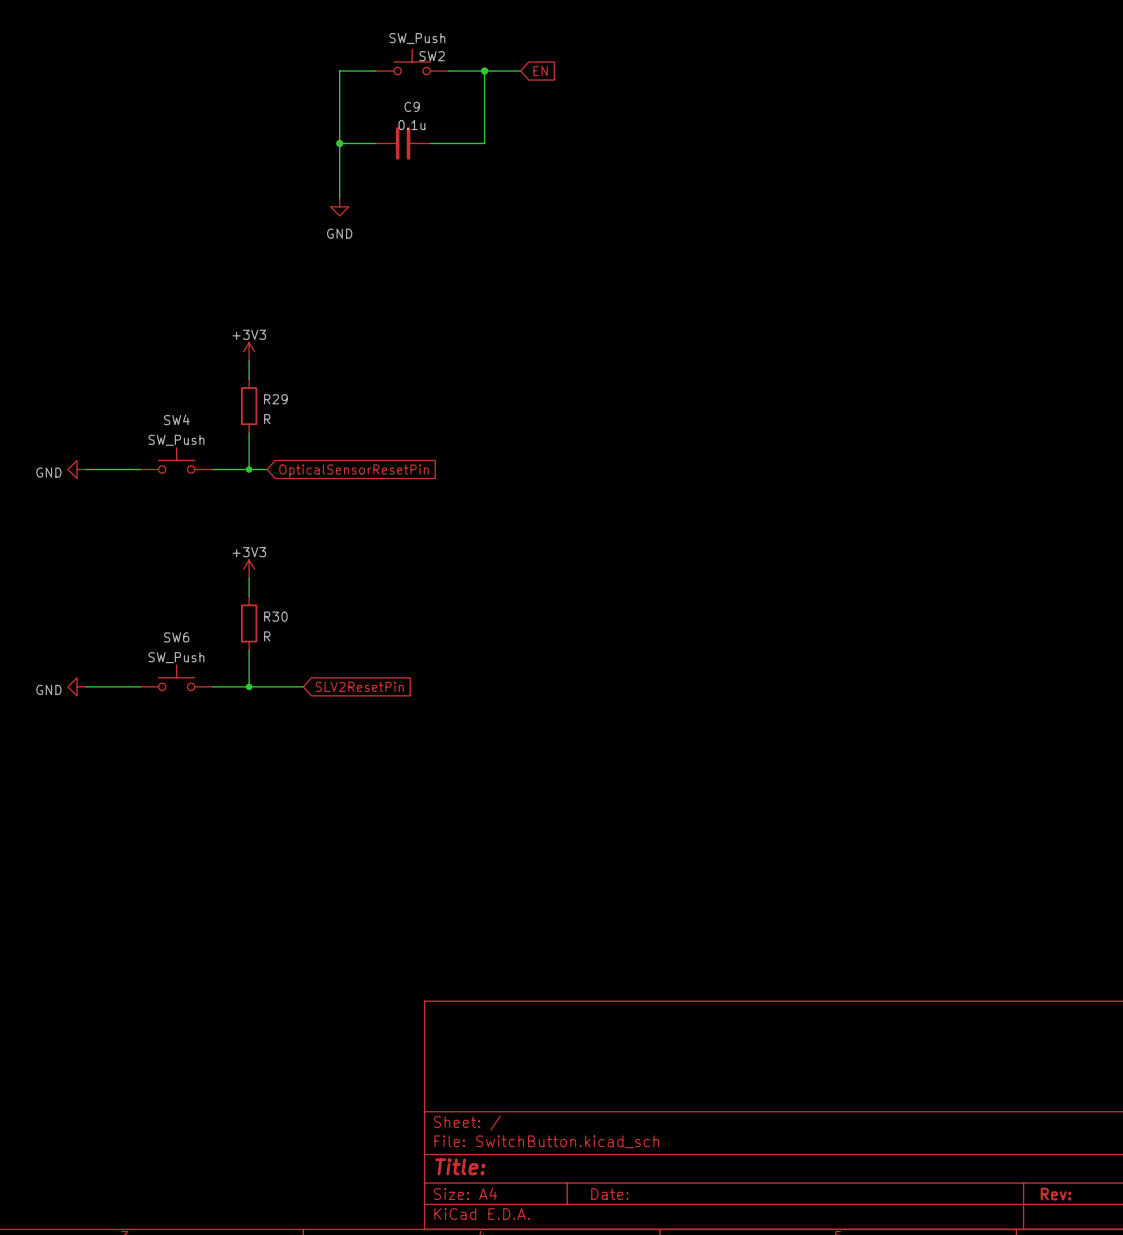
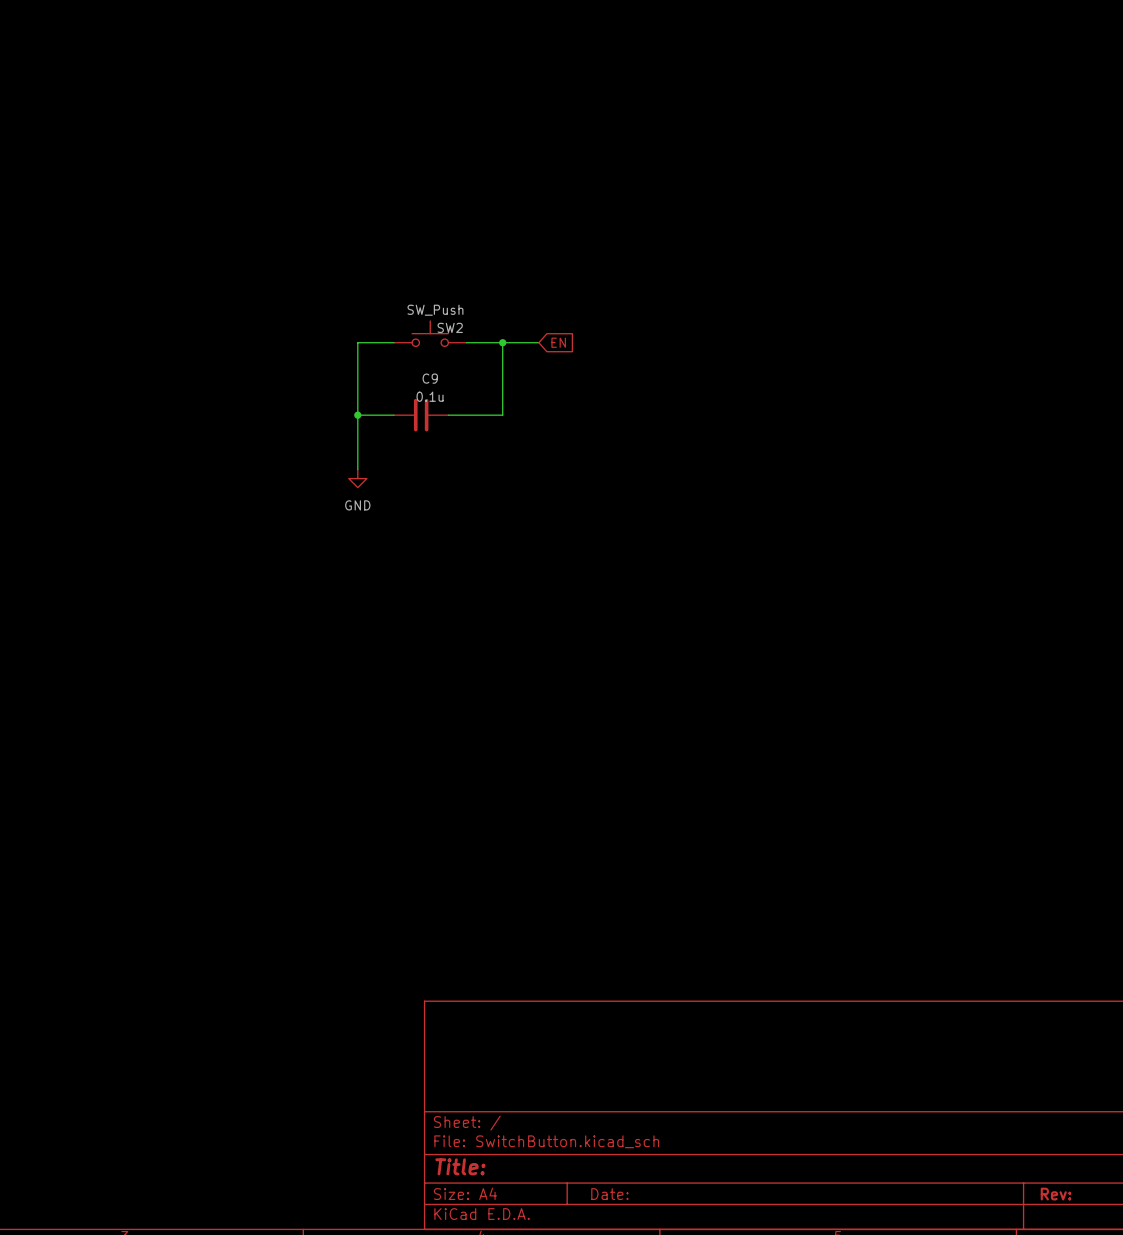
SW2 position: (412, 61) -> (430, 333)
wire: (375, 71) (339, 71) (339, 197) -> none
wire: (448, 71) (520, 71) -> none
wire: (484, 71) (484, 143) (430, 143) -> none
junction: (484, 71) -> none
global label: EN (540, 71) -> none
wire: (339, 143) (375, 143) -> none
junction: (339, 143) -> none
C9 position: (403, 143) -> (421, 415)
power symbol: GND (339, 206) -> none
wire: none -> (394, 342) (357, 342) (357, 469)
wire: none -> (466, 342) (538, 342)
wire: none -> (502, 342) (502, 415) (448, 415)
junction: none -> (502, 342)
global label: none -> EN (558, 342)
power symbol: +3V3 (249, 351) -> none
wire: (249, 360) (249, 378) -> none
R29: R (249, 406) -> none
wire: none -> (357, 415) (394, 415)
junction: none -> (357, 415)
wire: (249, 433) (249, 469) -> none
SW4: SW_Push (176, 460) -> none
power symbol: GND (77, 469) -> none
wire: (86, 469) (140, 469) -> none
wire: (212, 469) (267, 469) -> none
junction: (249, 469) -> none
global label: OpticalSensorResetPin (354, 471) -> none
power symbol: none -> GND (357, 478)
power symbol: +3V3 (249, 569) -> none
wire: (249, 578) (249, 596) -> none
R30: R (249, 623) -> none
wire: (249, 650) (249, 686) -> none
SW6: SW_Push (176, 677) -> none
power symbol: GND (77, 686) -> none
wire: (86, 686) (140, 686) -> none
wire: (212, 686) (303, 686) -> none
junction: (249, 686) -> none
global label: SLV2ResetPin (359, 686) -> none

